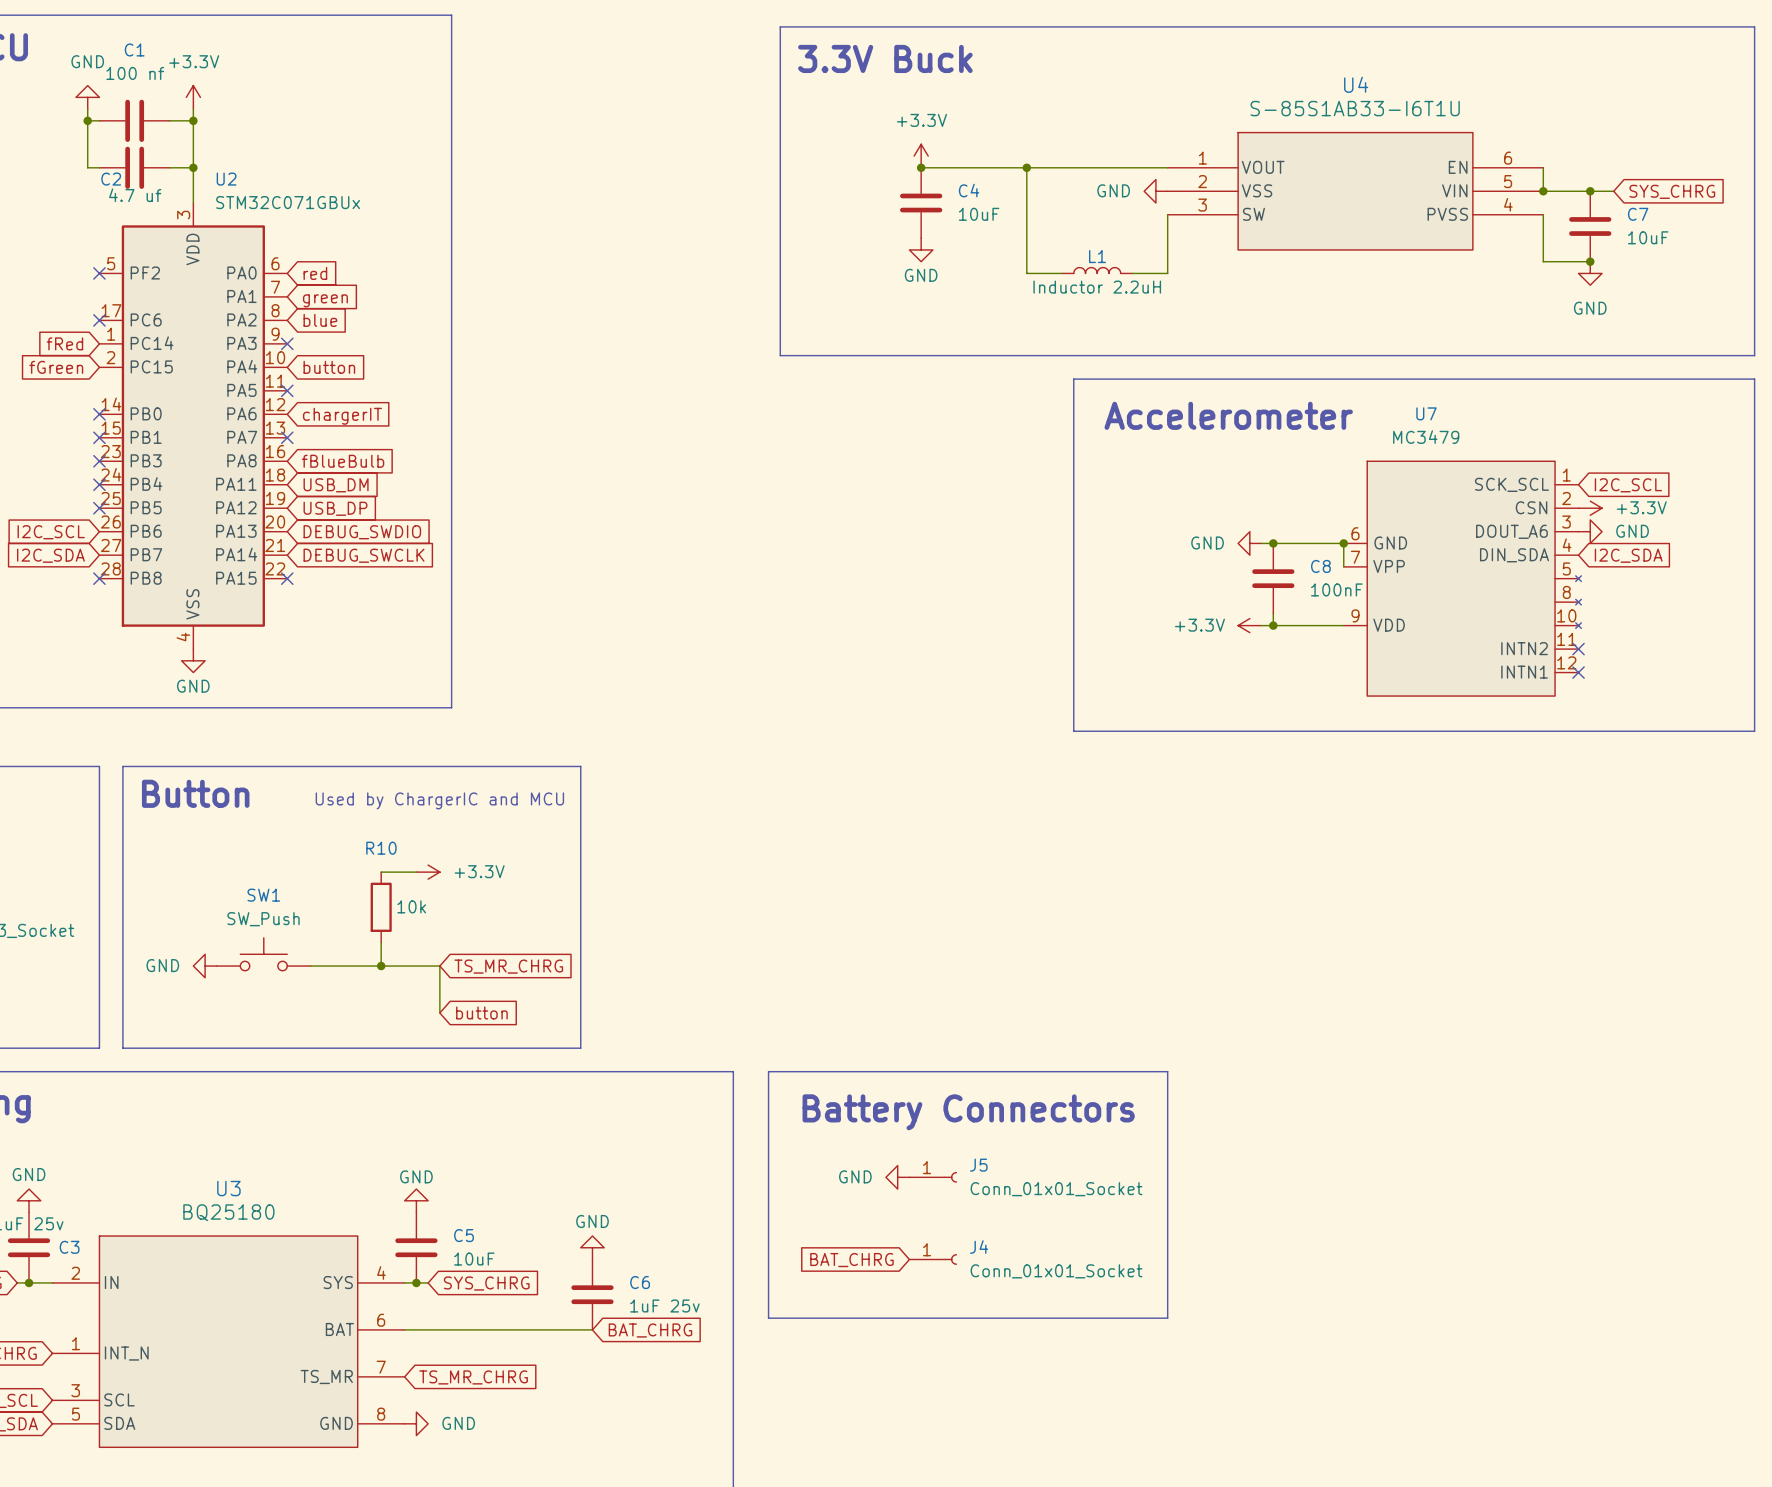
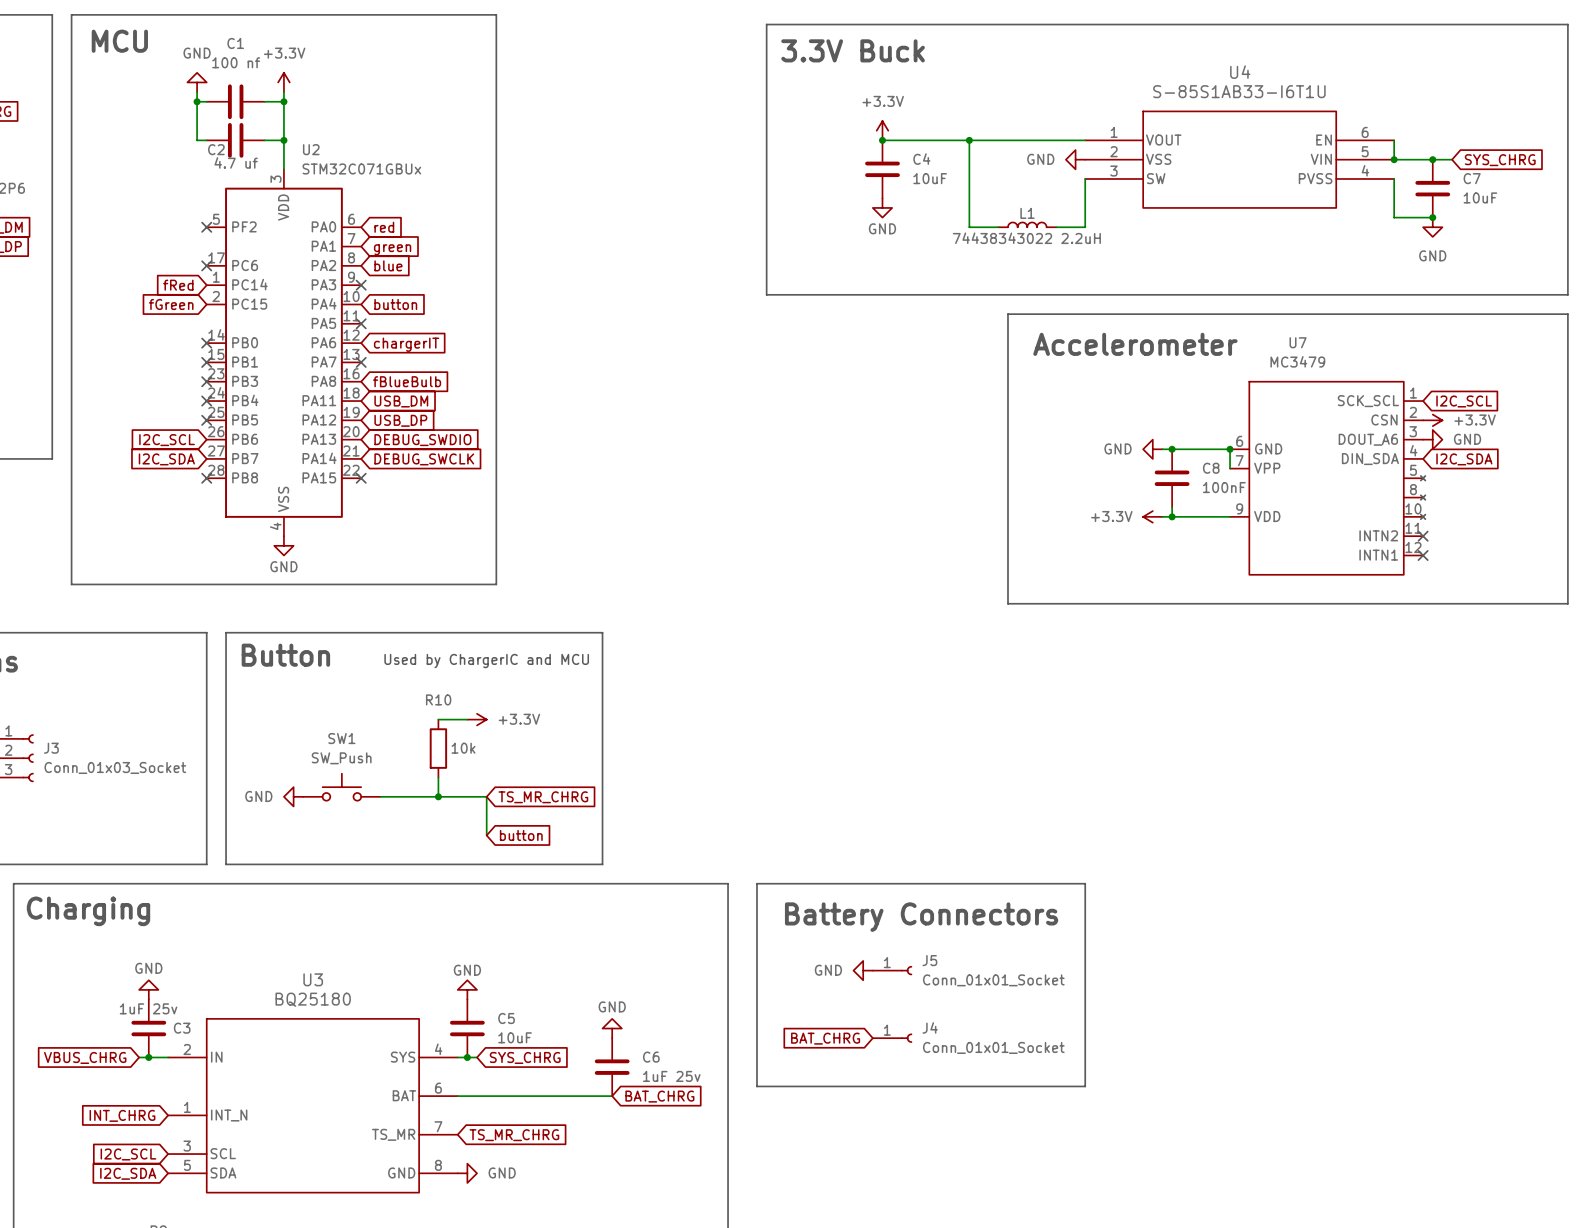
L1 value: Inductor 2.2uH (1097, 287) -> 74438343022 2.2uH (1026, 238)

